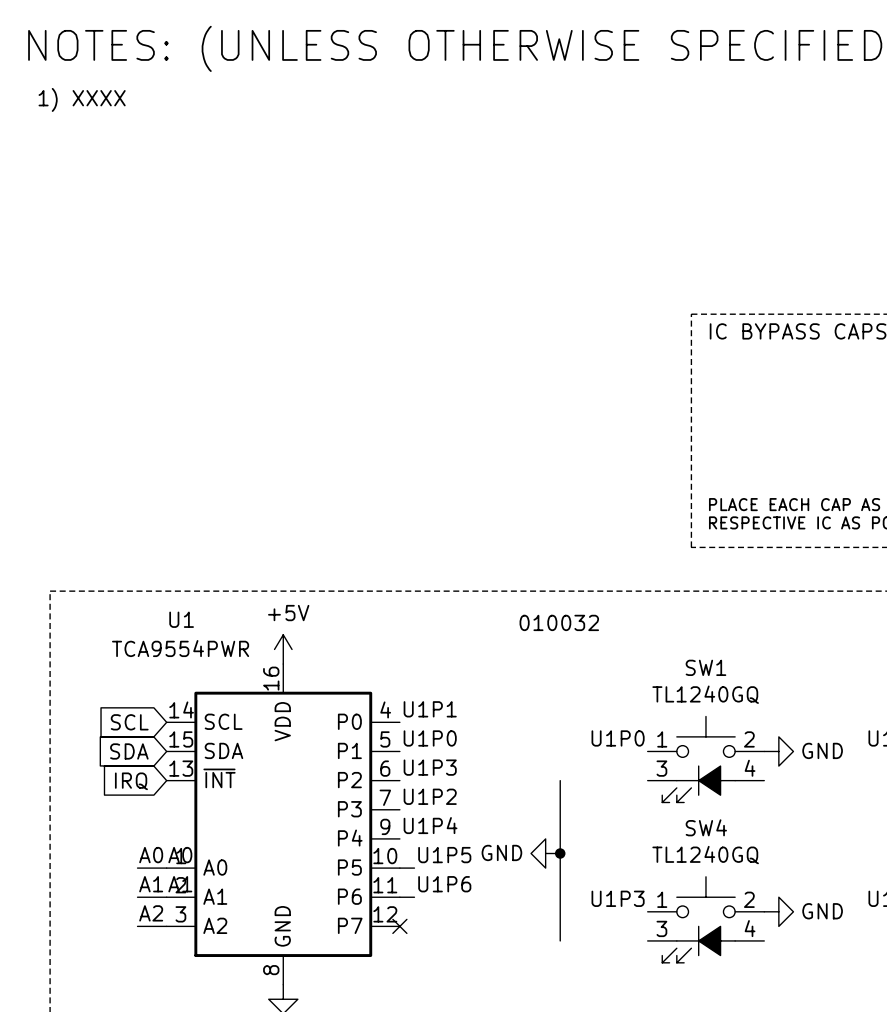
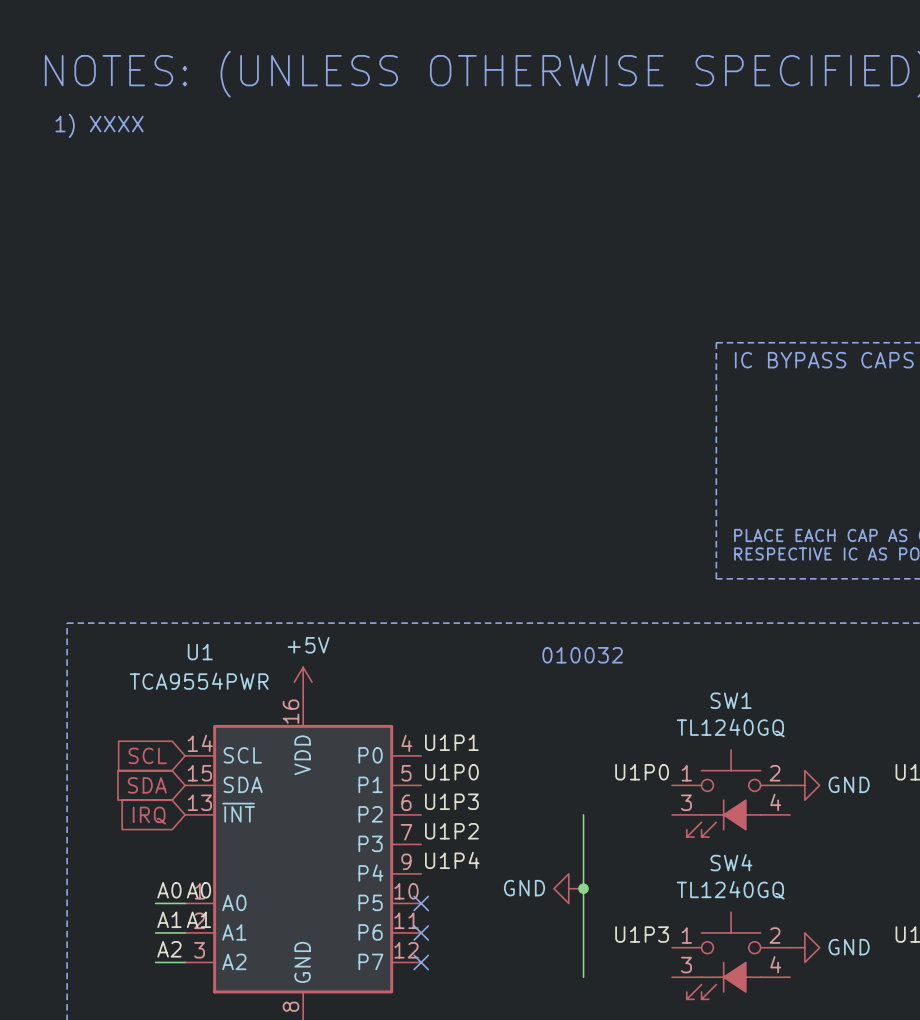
label: U1P5 (444, 855) -> none
wire: (399, 868) (414, 868) -> none
no-connect mark: none -> (421, 903)
label: U1P6 (444, 884) -> none
wire: (399, 897) (414, 897) -> none
no-connect mark: none -> (421, 932)

